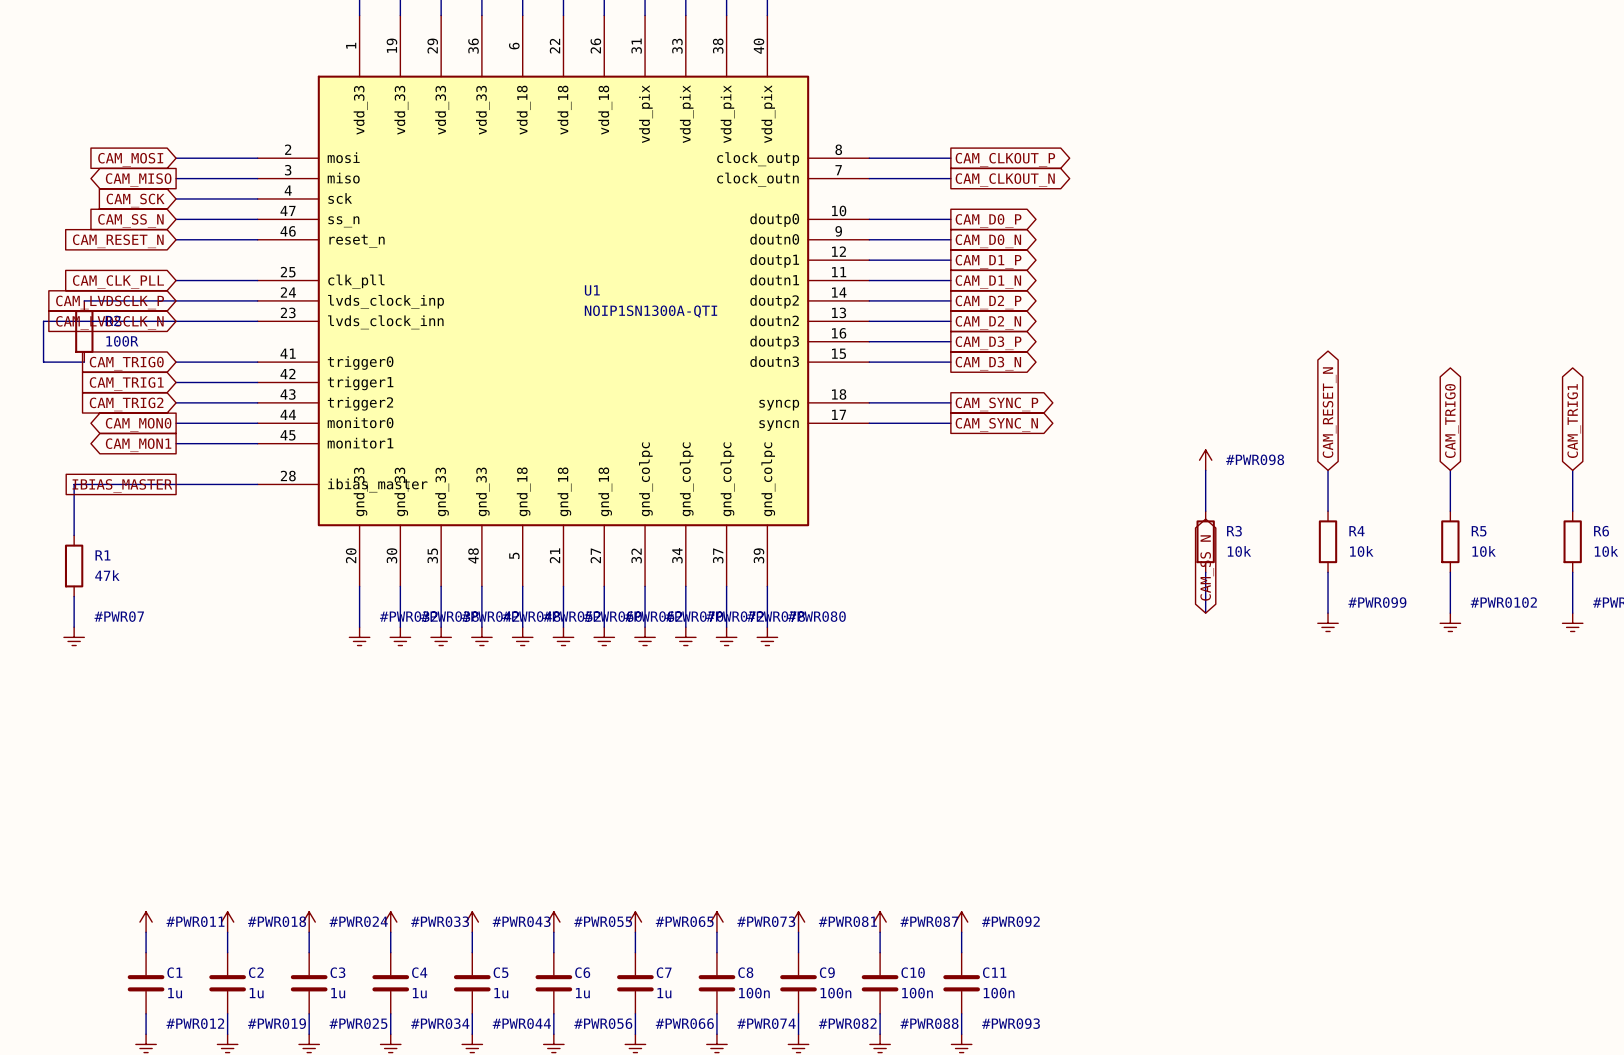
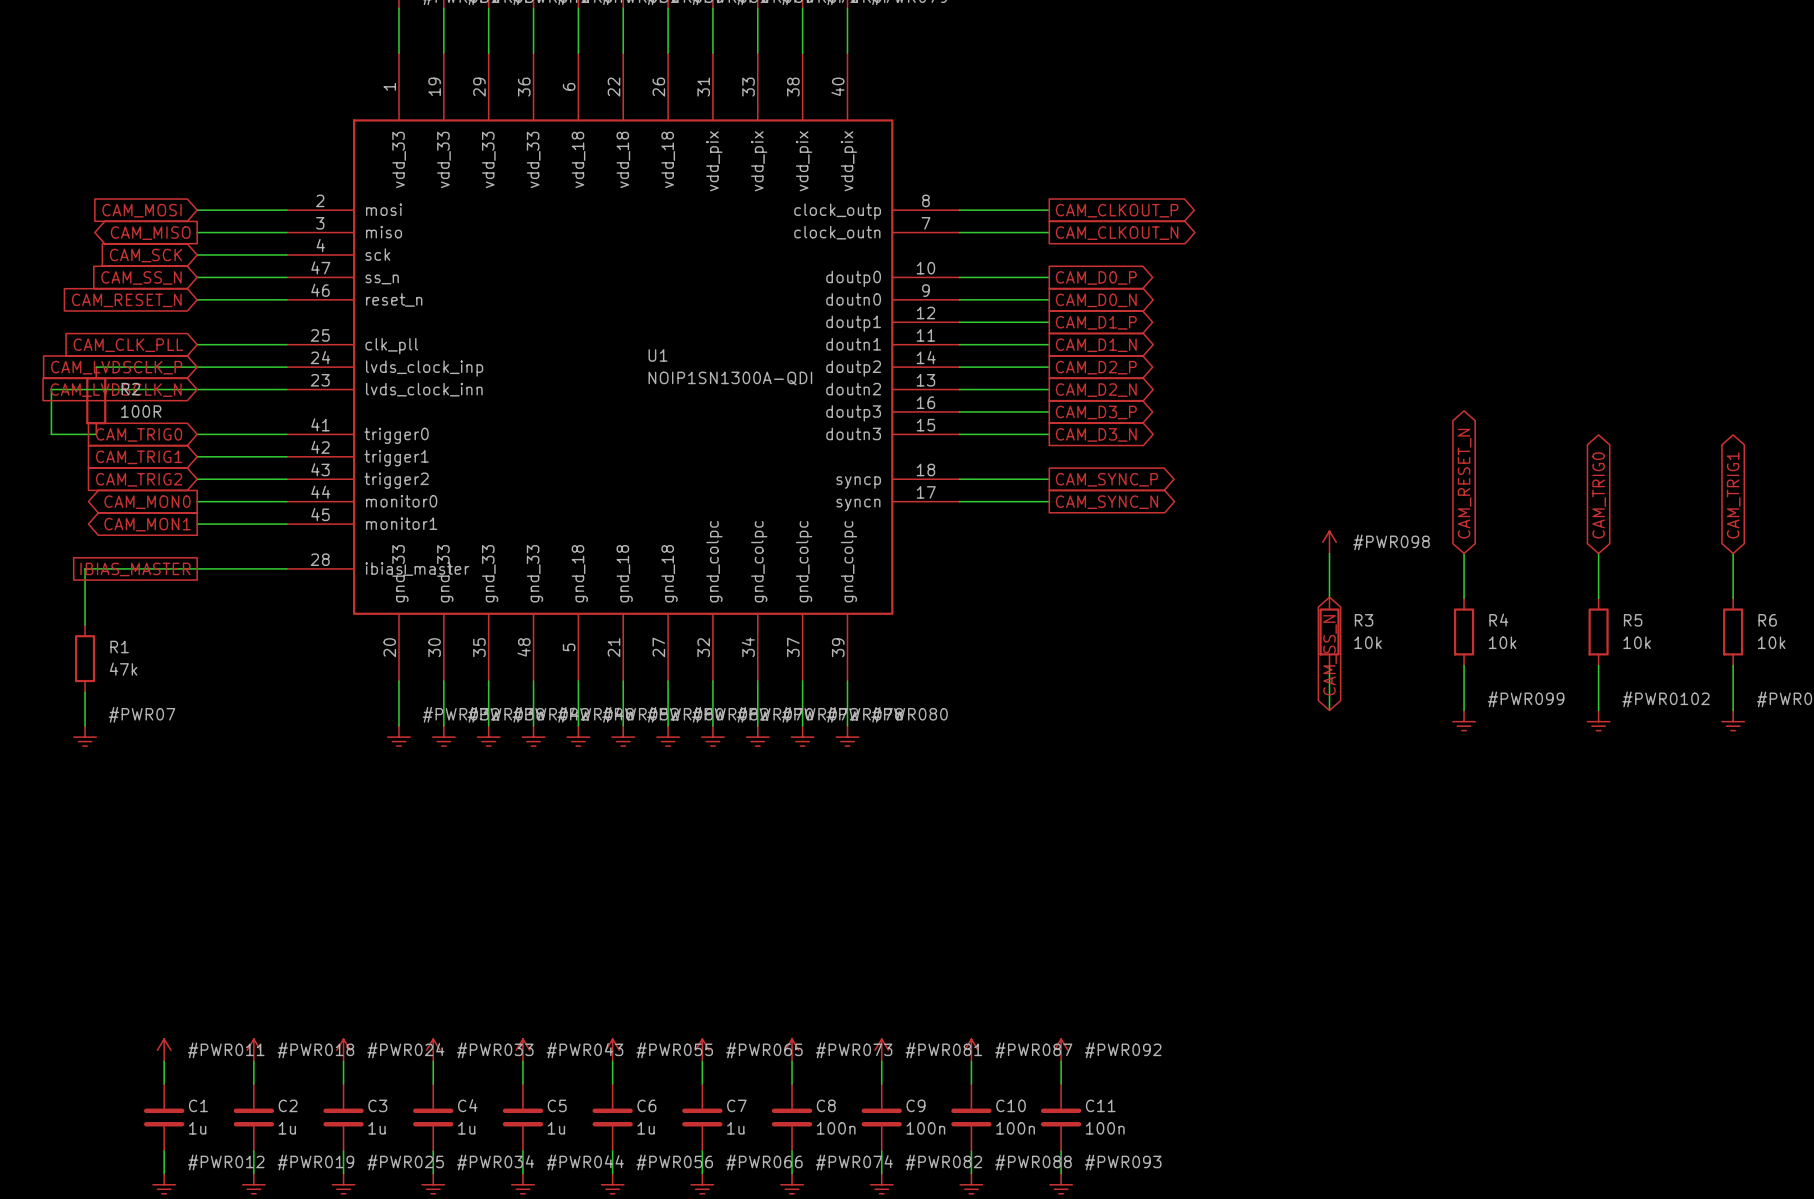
U1 value: NOIP1SN1300A-QTI (651, 311) -> NOIP1SN1300A-QDI (730, 378)

